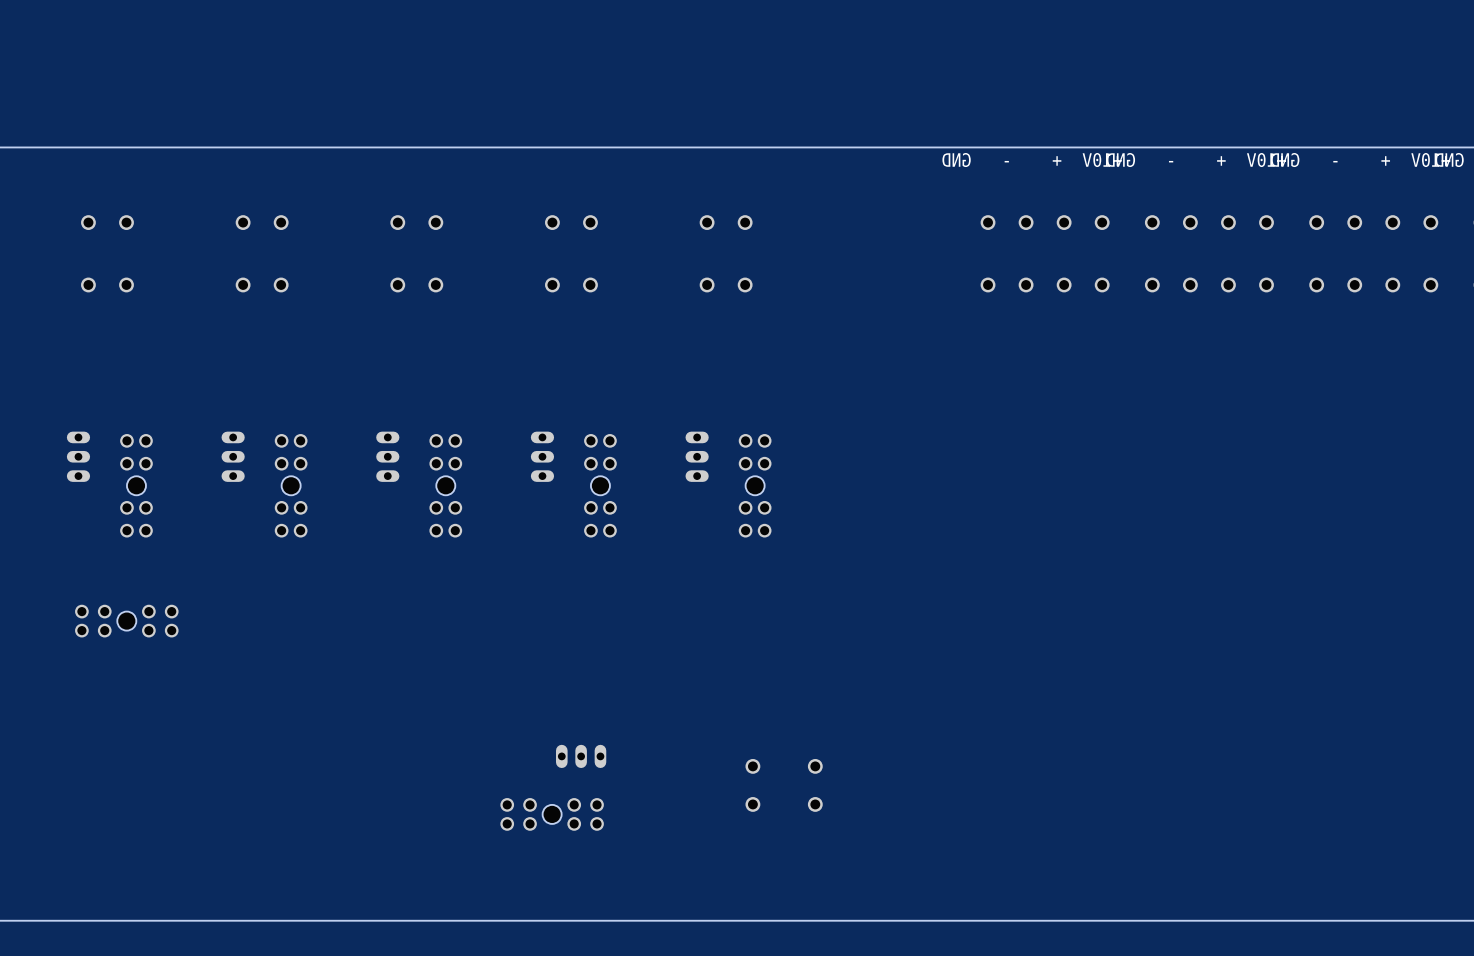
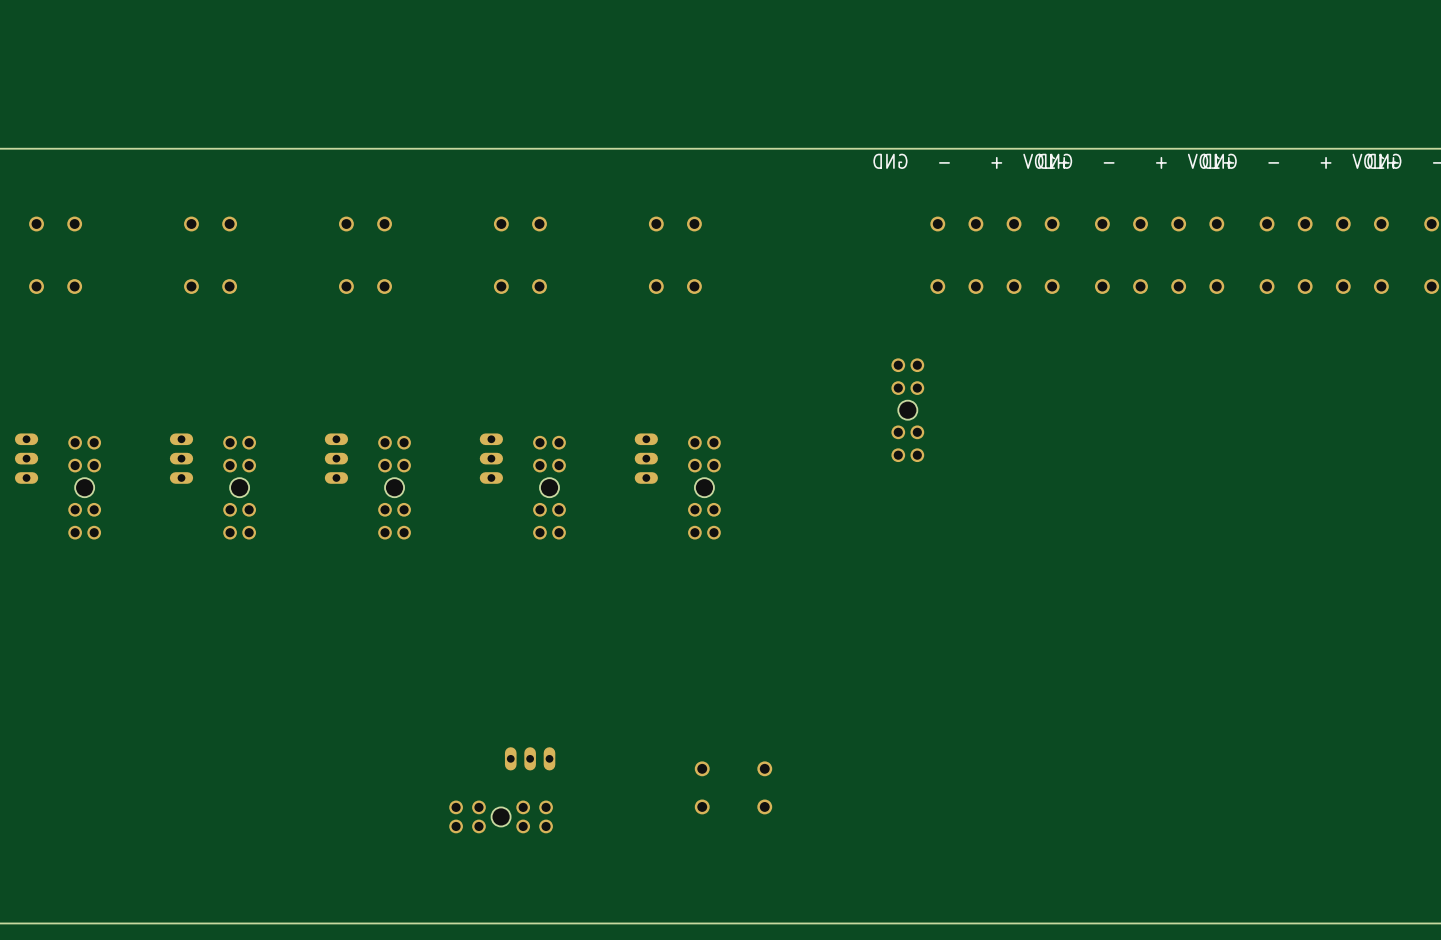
part: none -> (907, 410)
part: (126, 621) -> none

